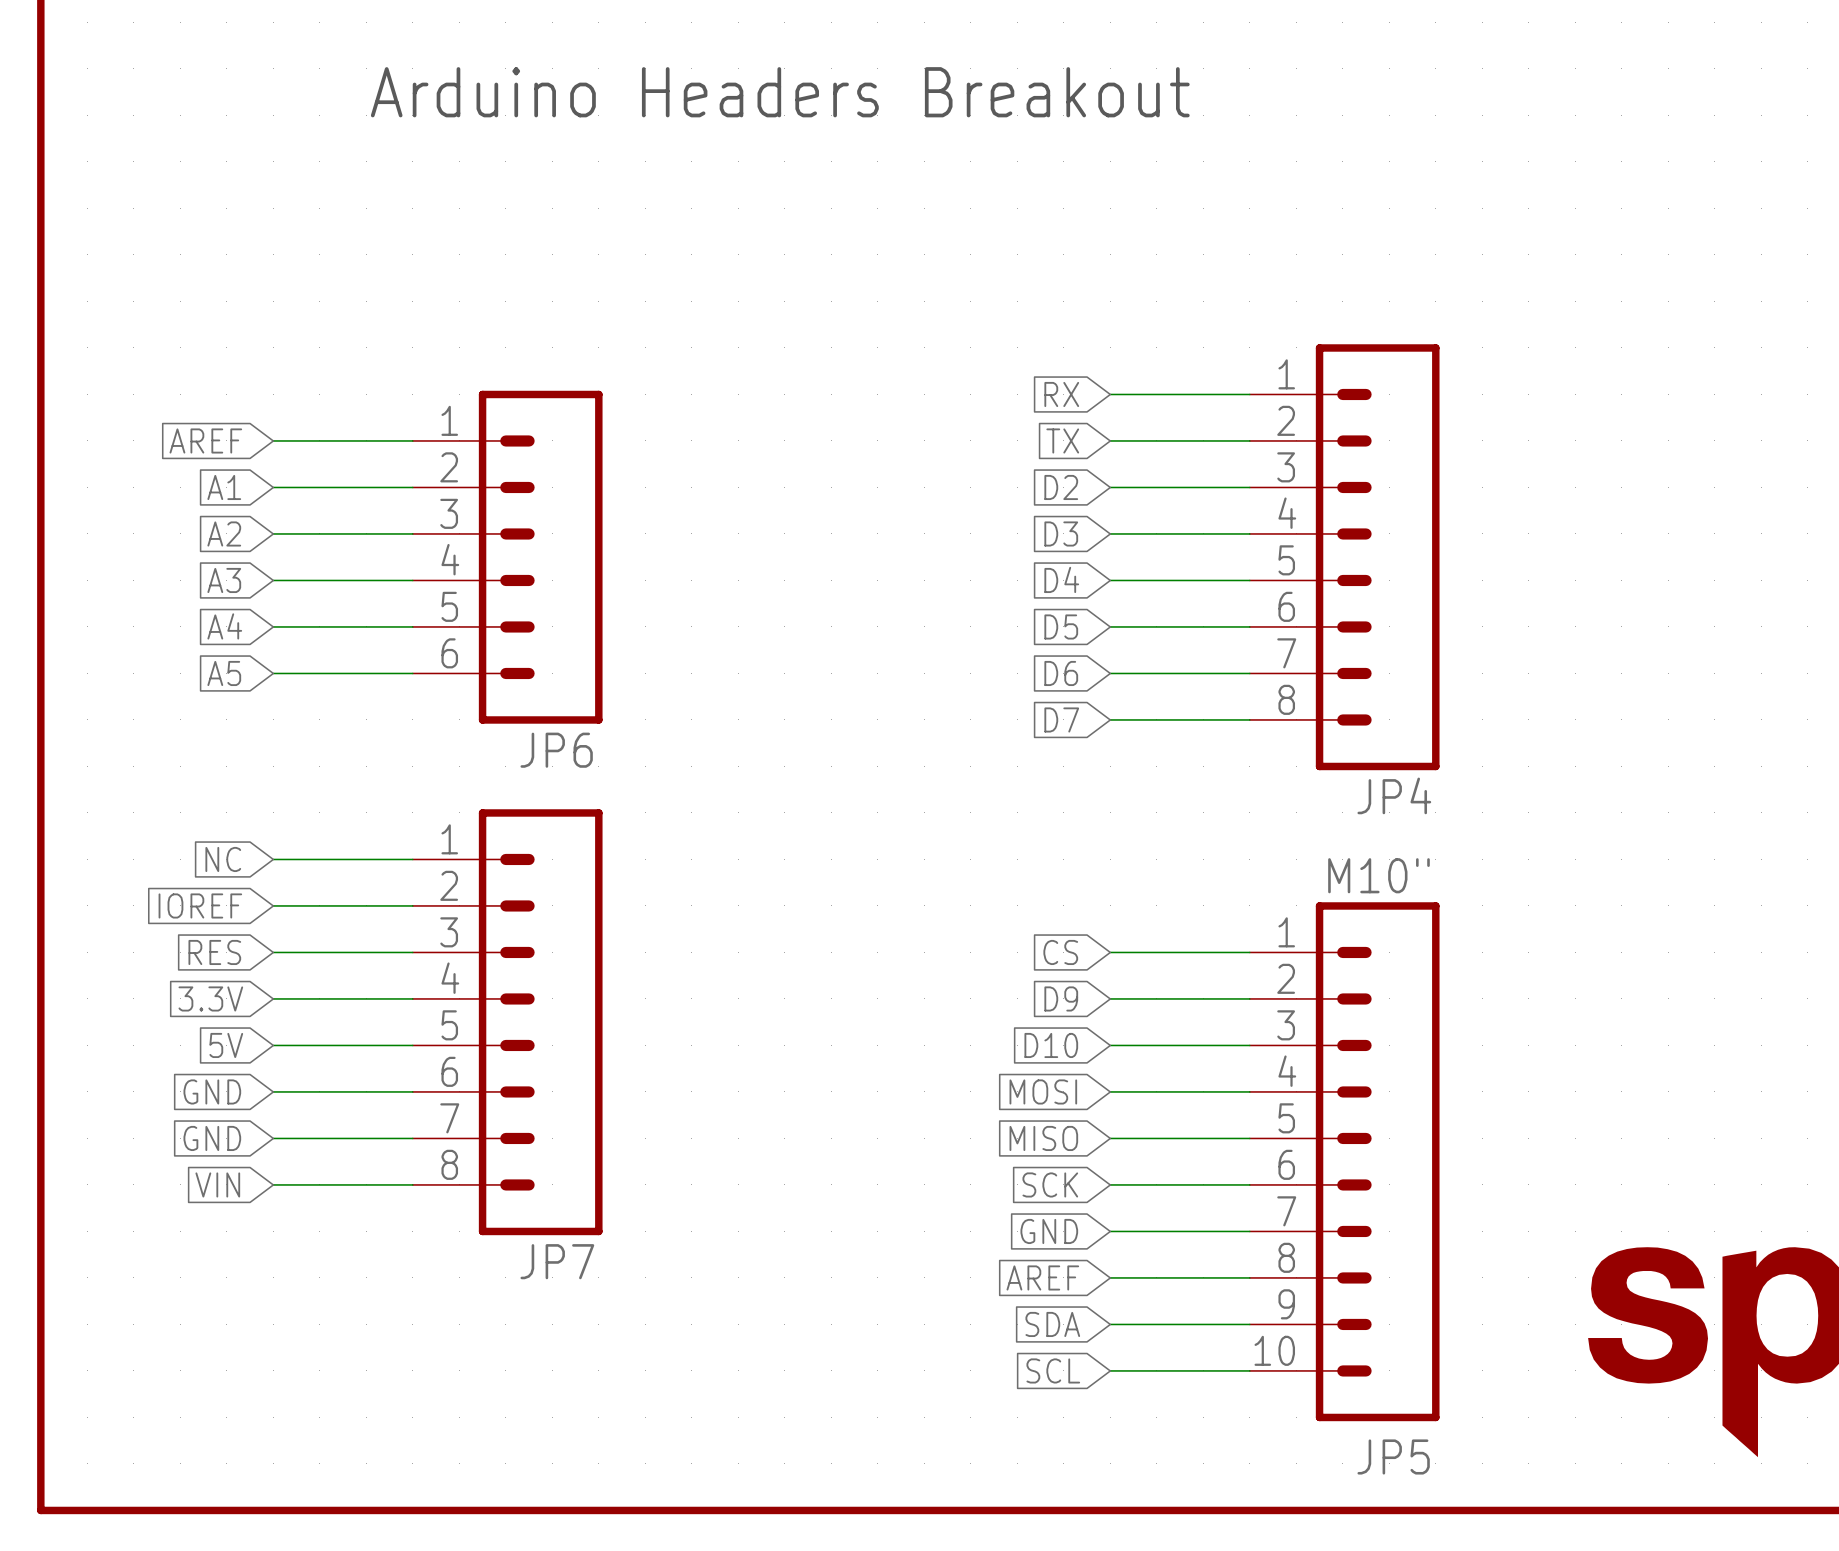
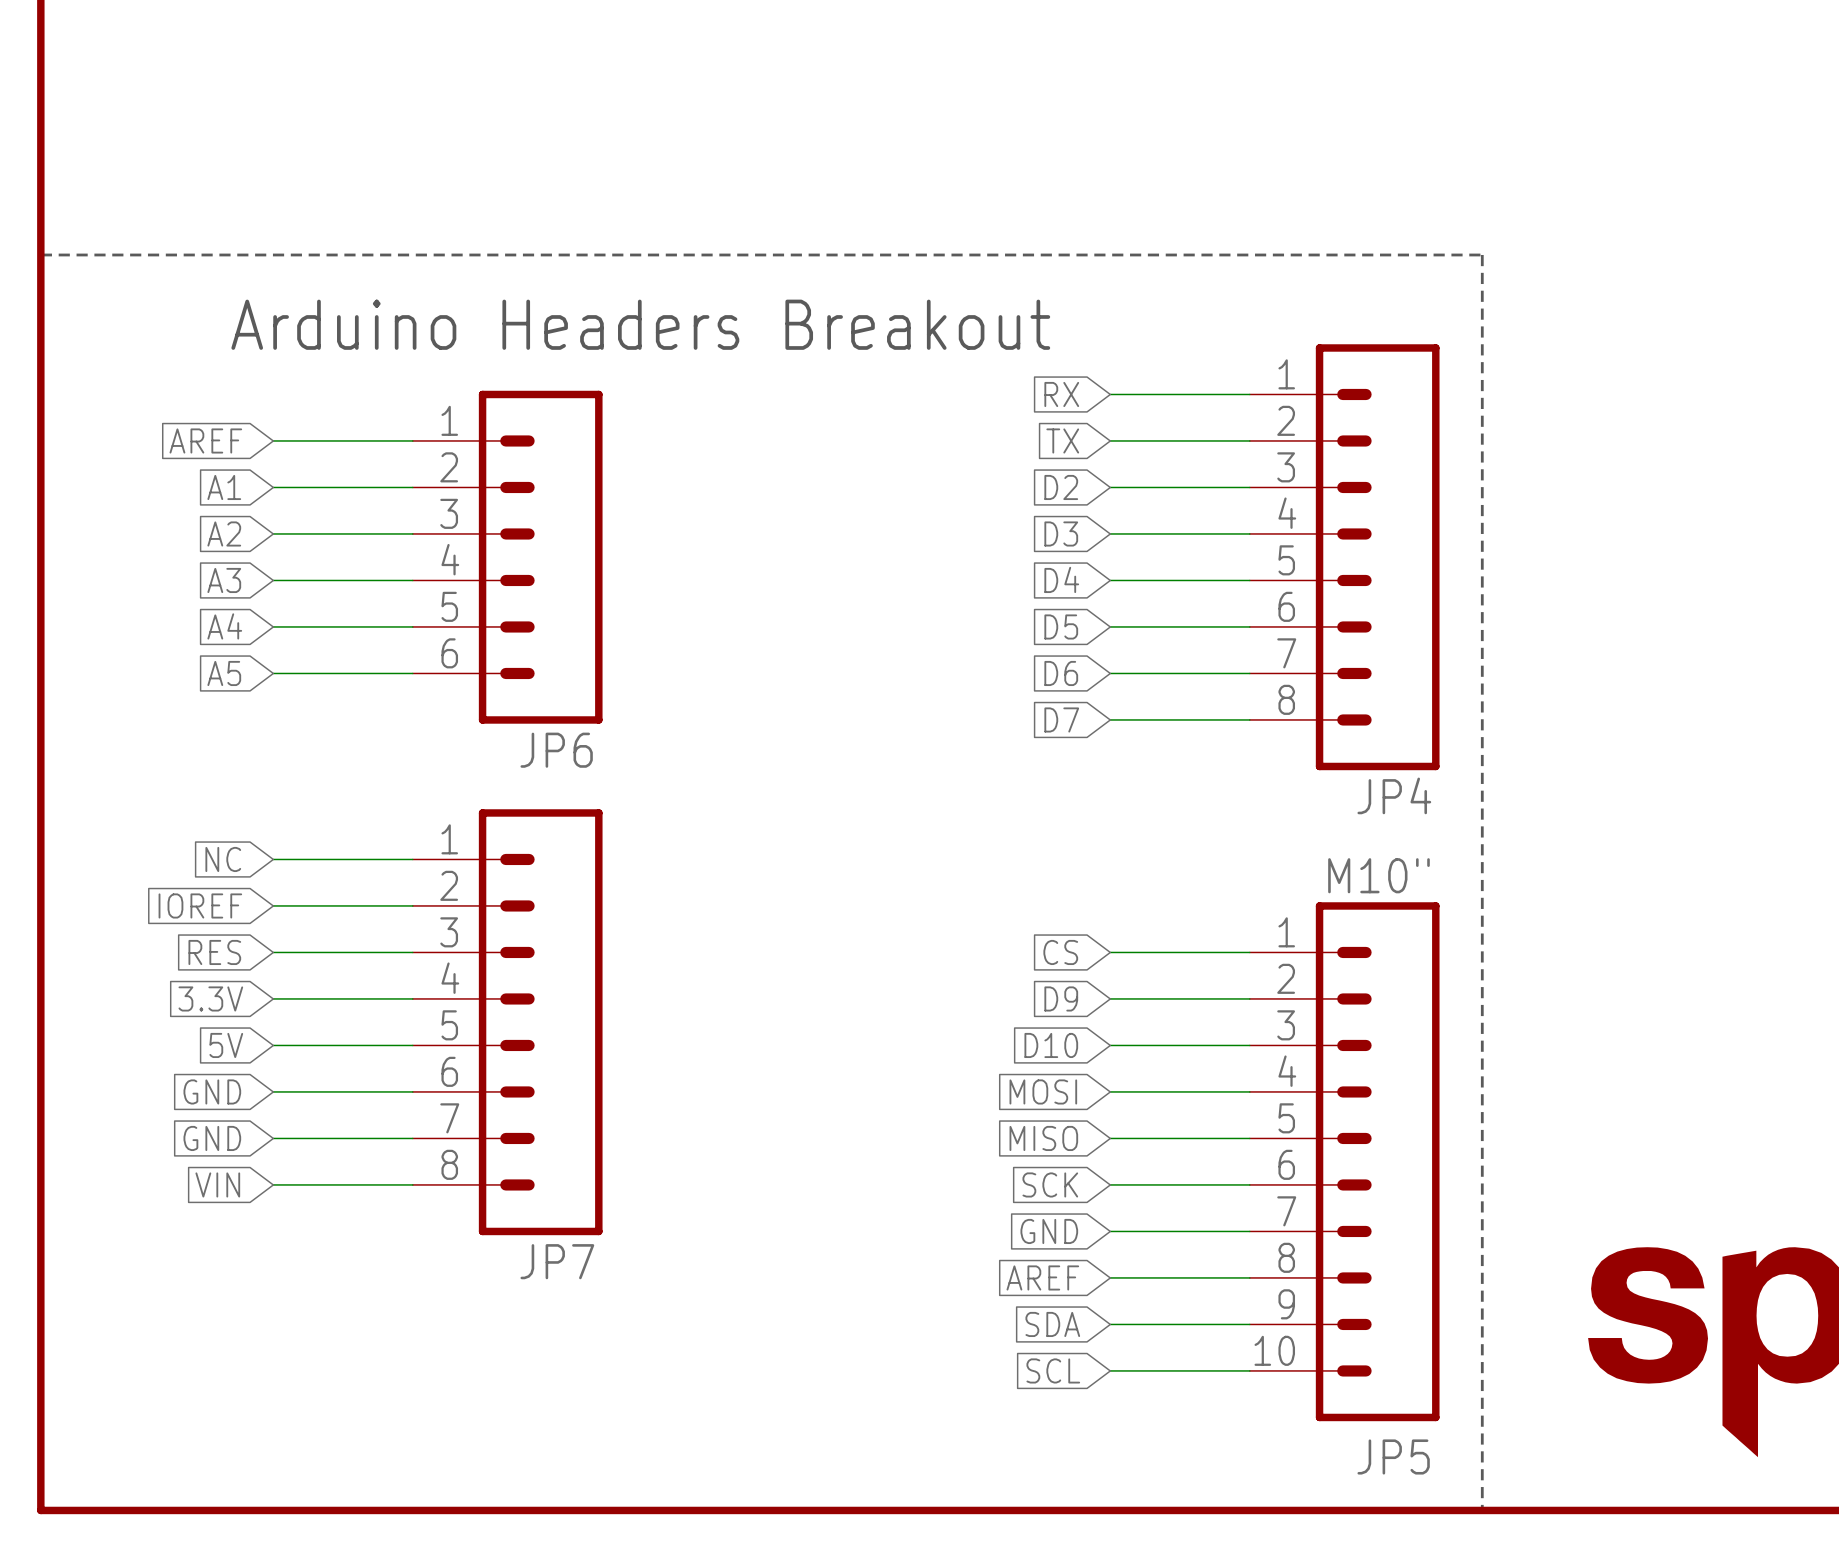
text position: Arduino Headers Breakout (780, 92) -> Arduino Headers Breakout (640, 324)
line: none -> (40, 254) (1482, 254) (1482, 1510)

